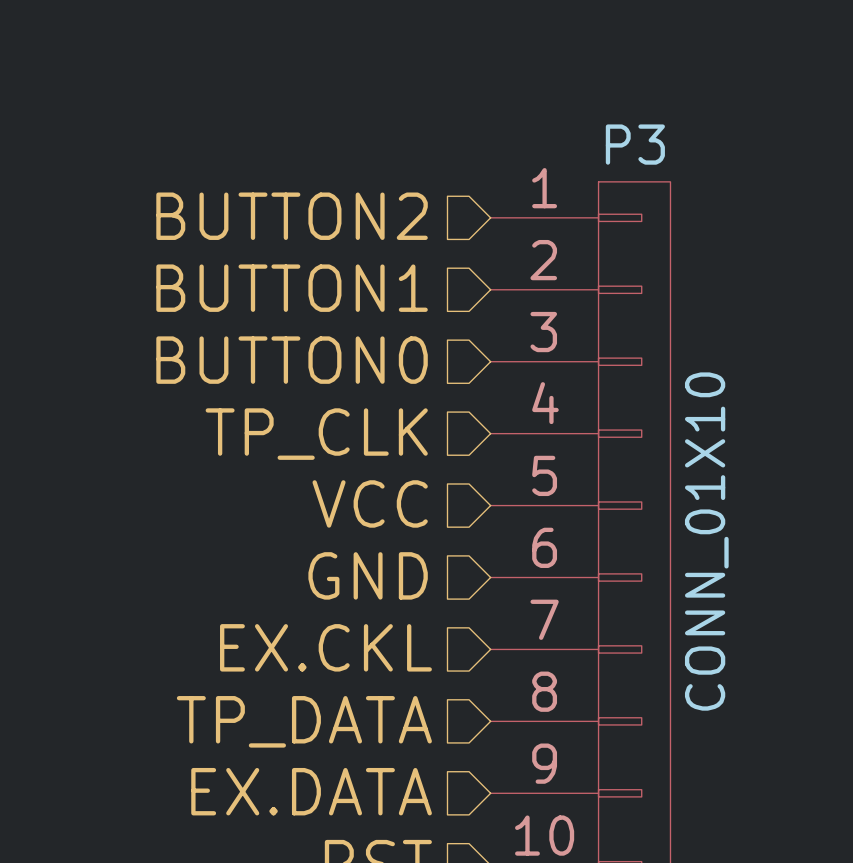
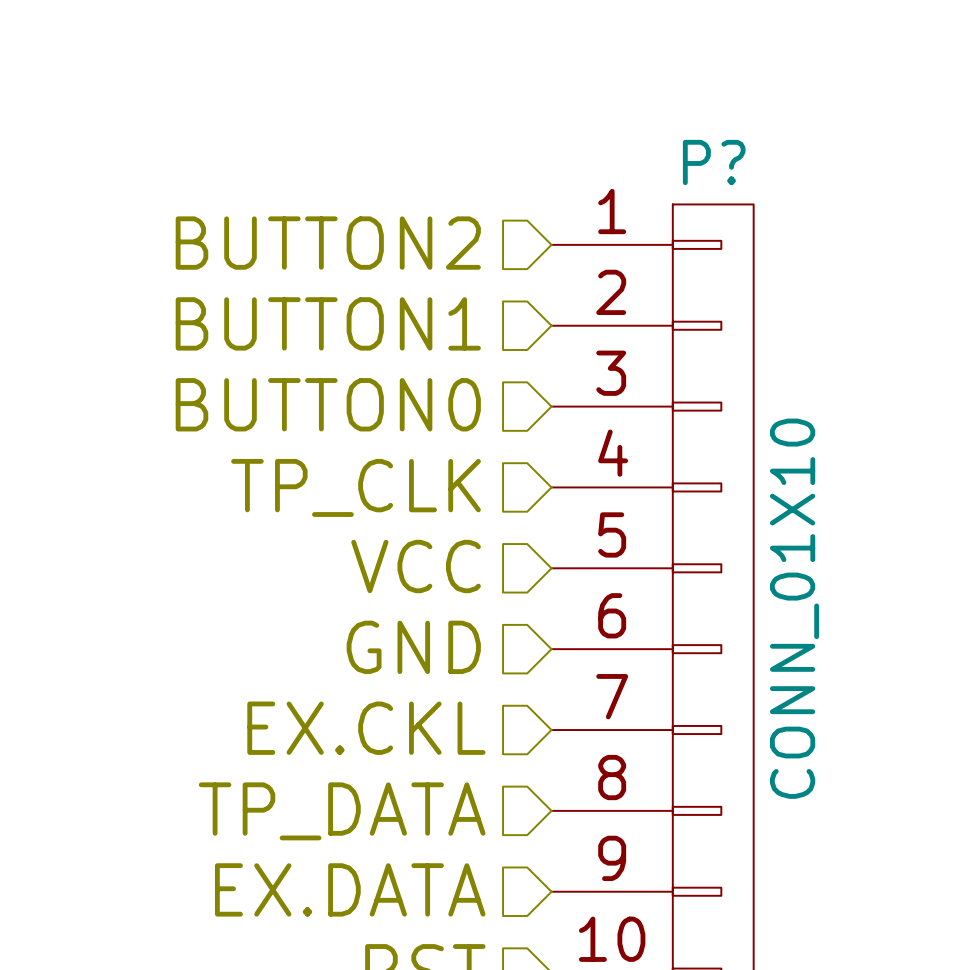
P3 name: P3 (635, 144) -> P? (714, 162)

